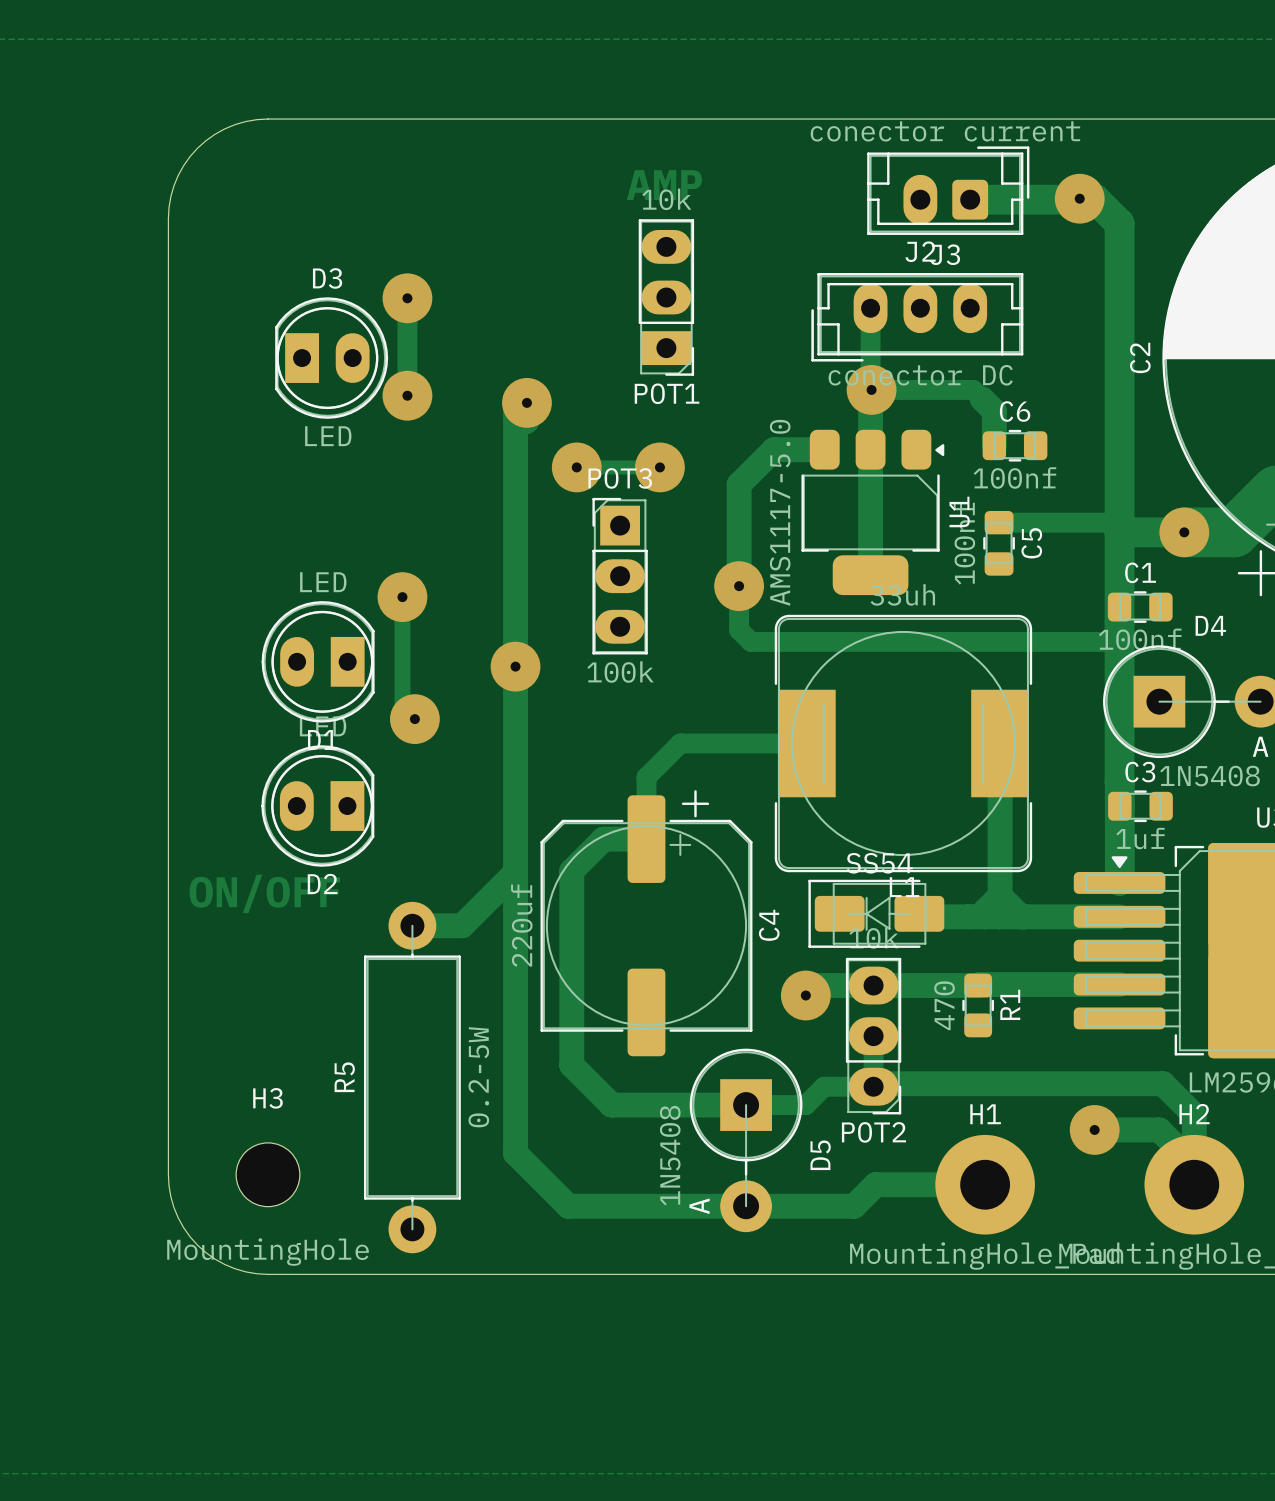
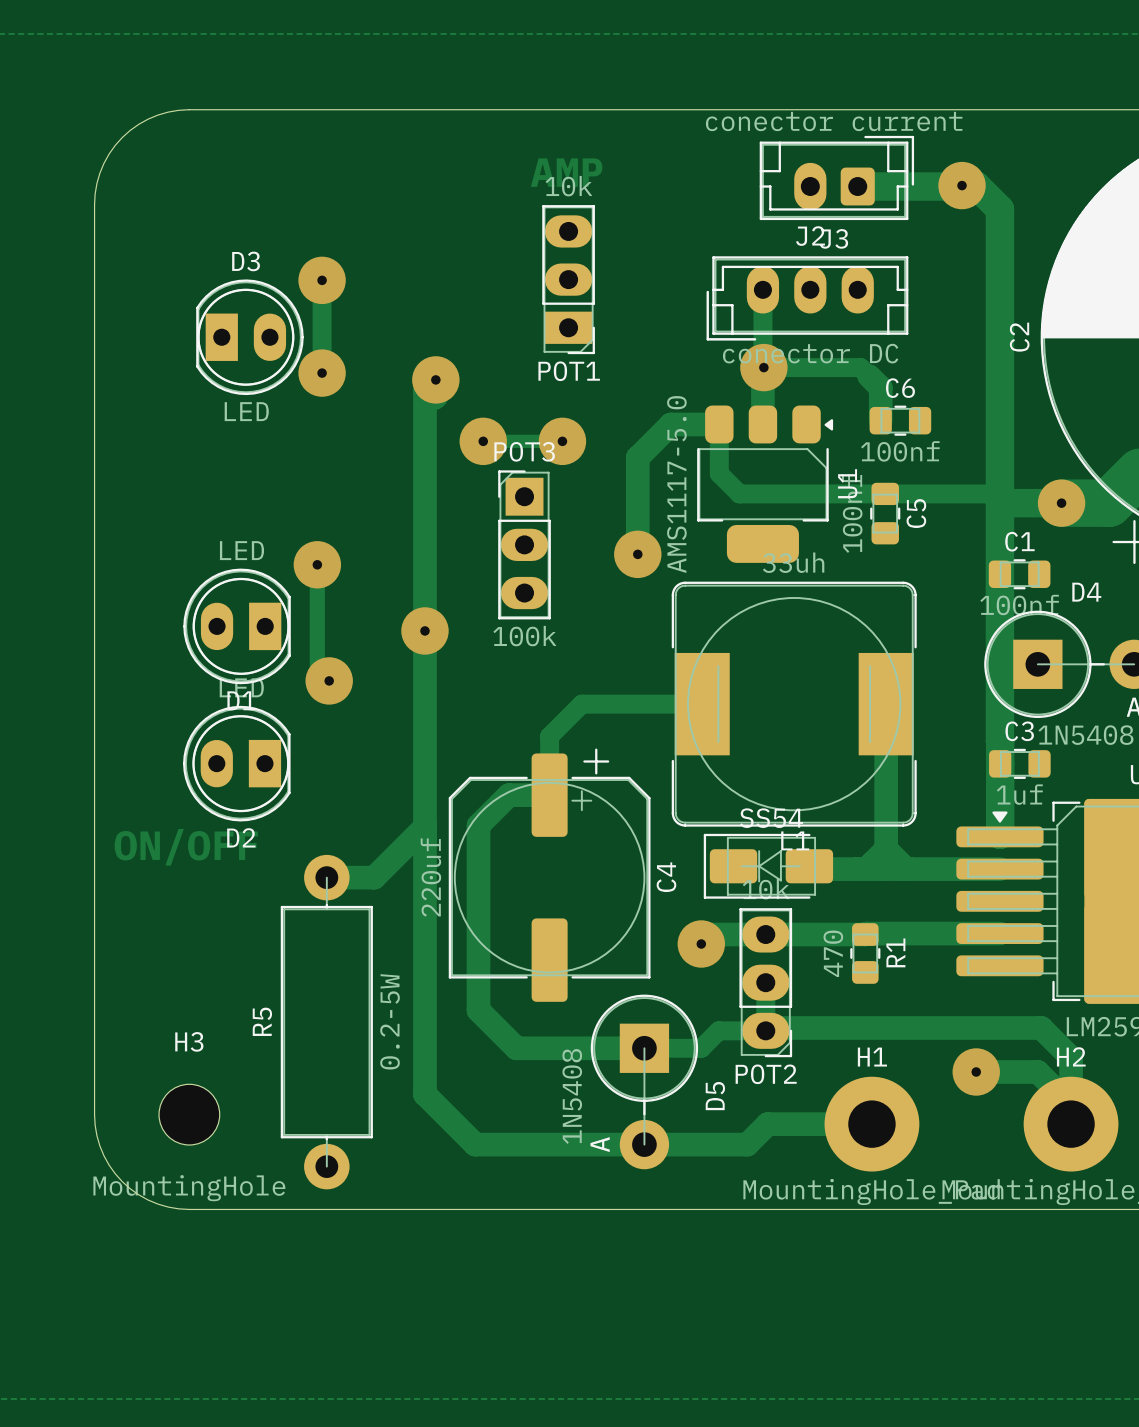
track: none -> (719, 424) (719, 473) (739, 493) (885, 493)
track: (870, 449) (870, 575) -> none
track: (739, 586) (739, 629) (751, 641) (1119, 641) -> none

